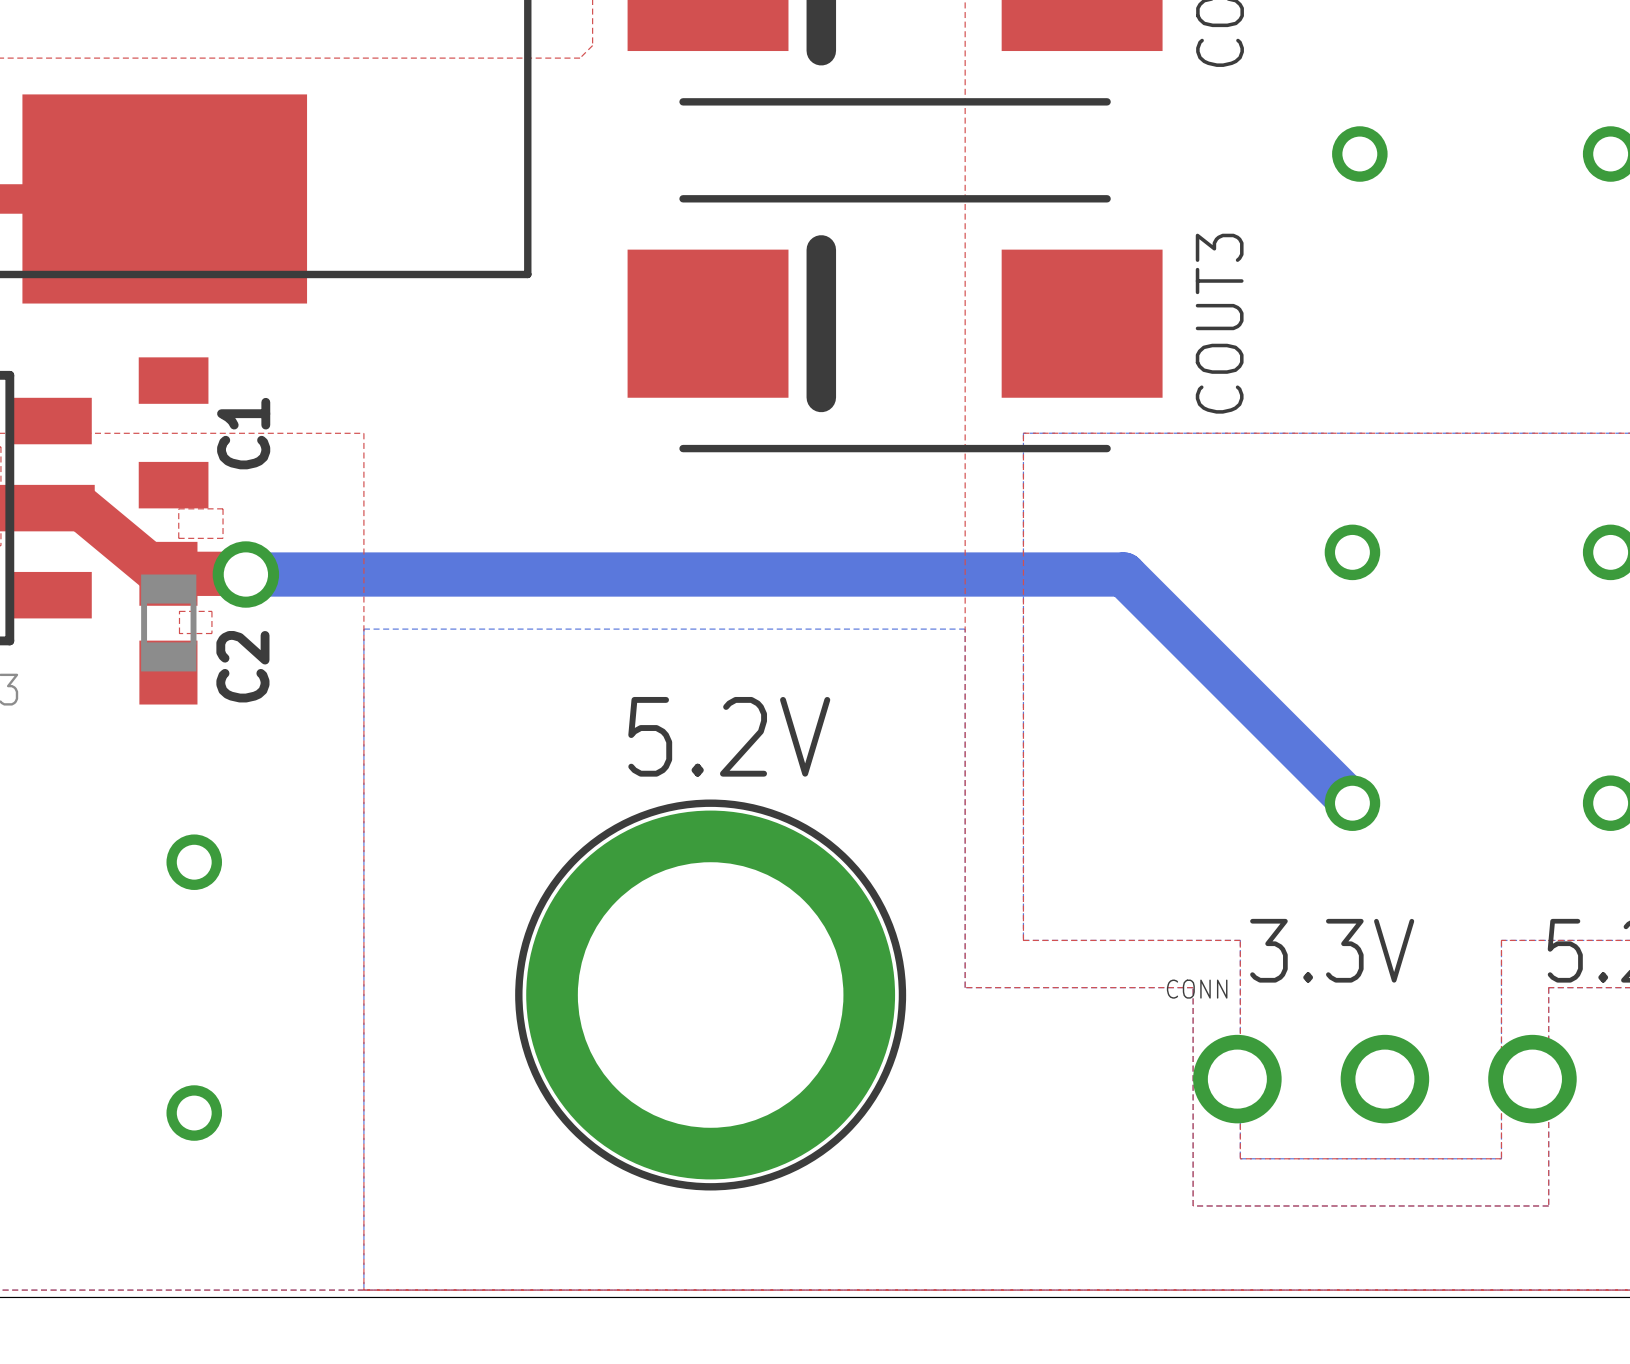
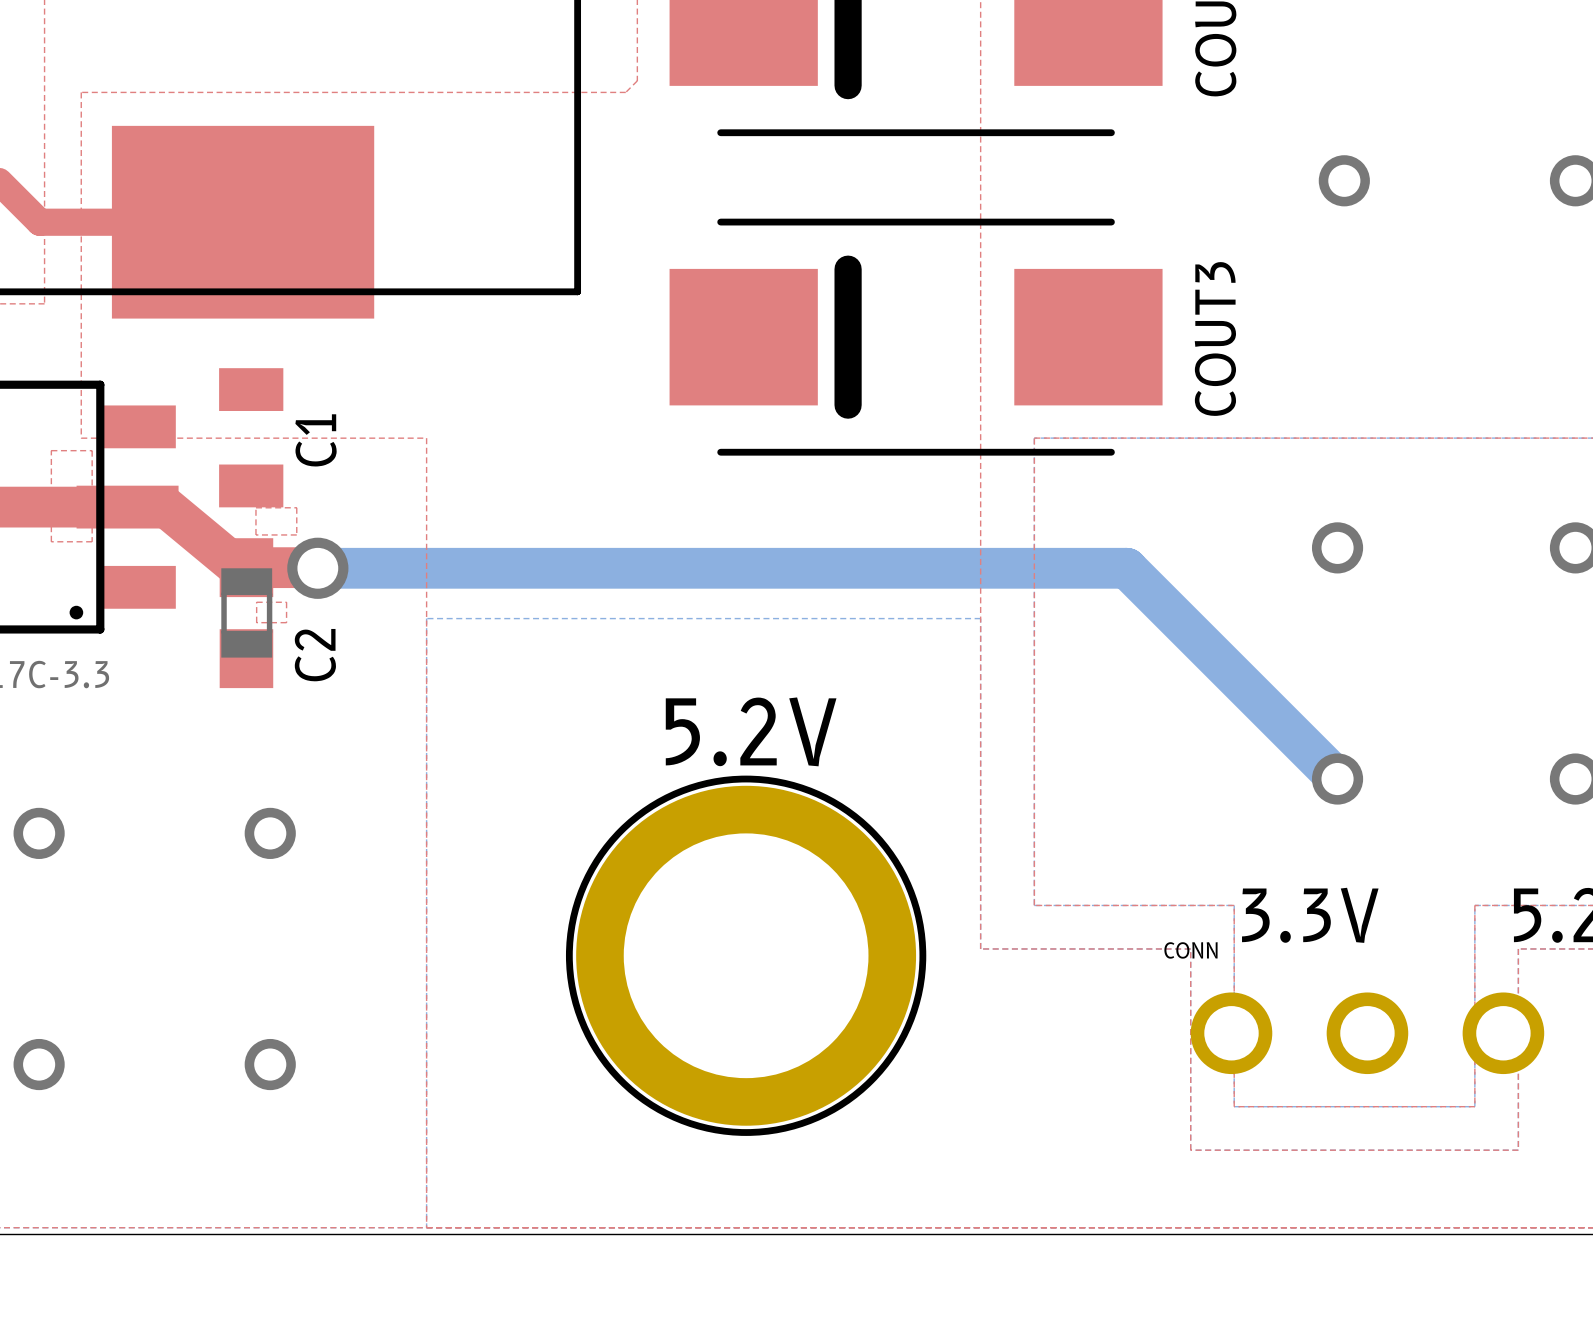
text position: 5.2V (729, 736) -> 5.2V (751, 731)

